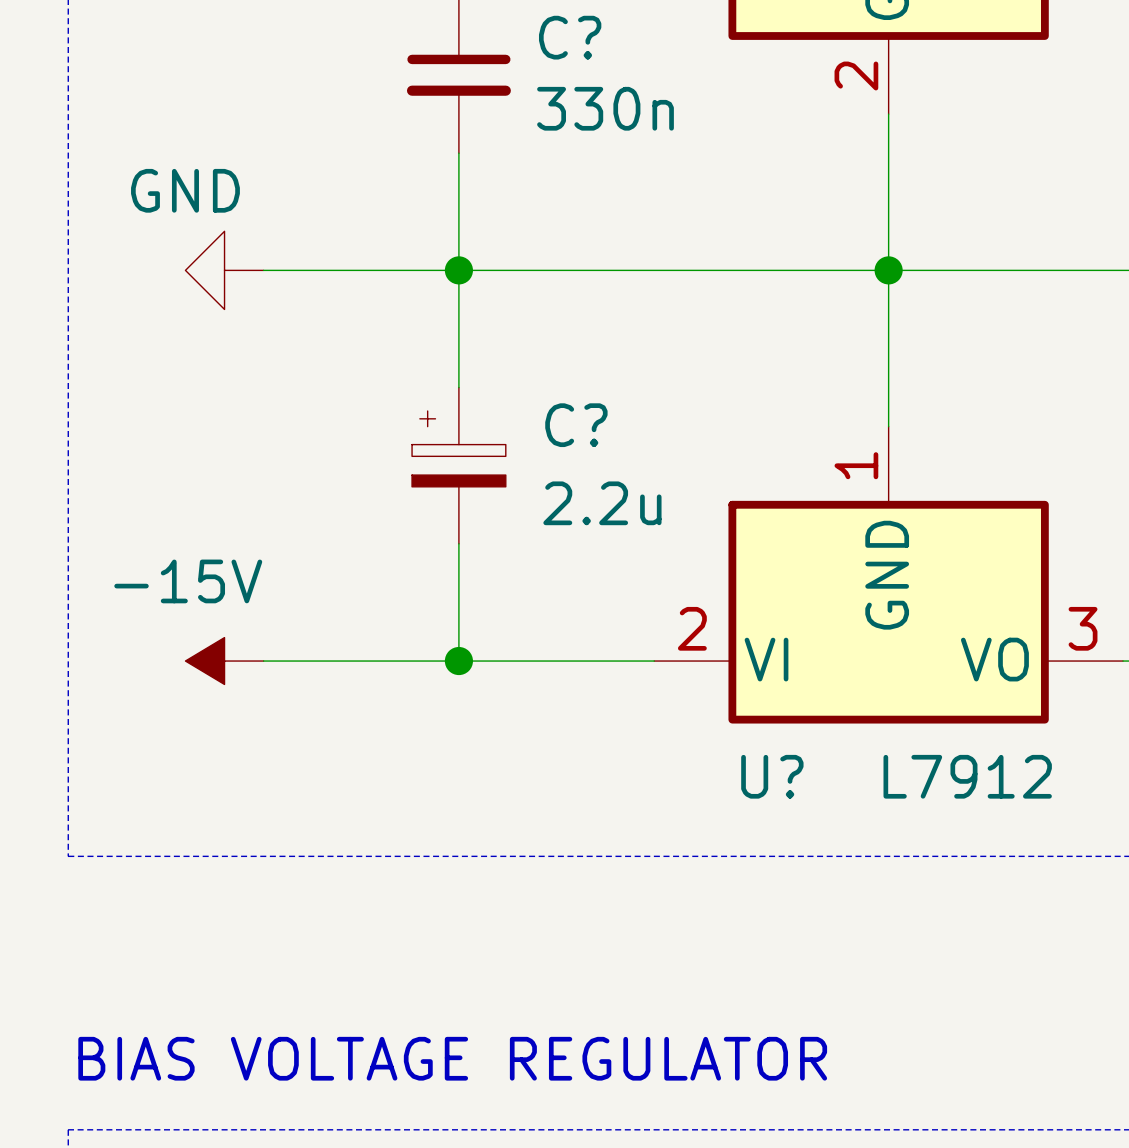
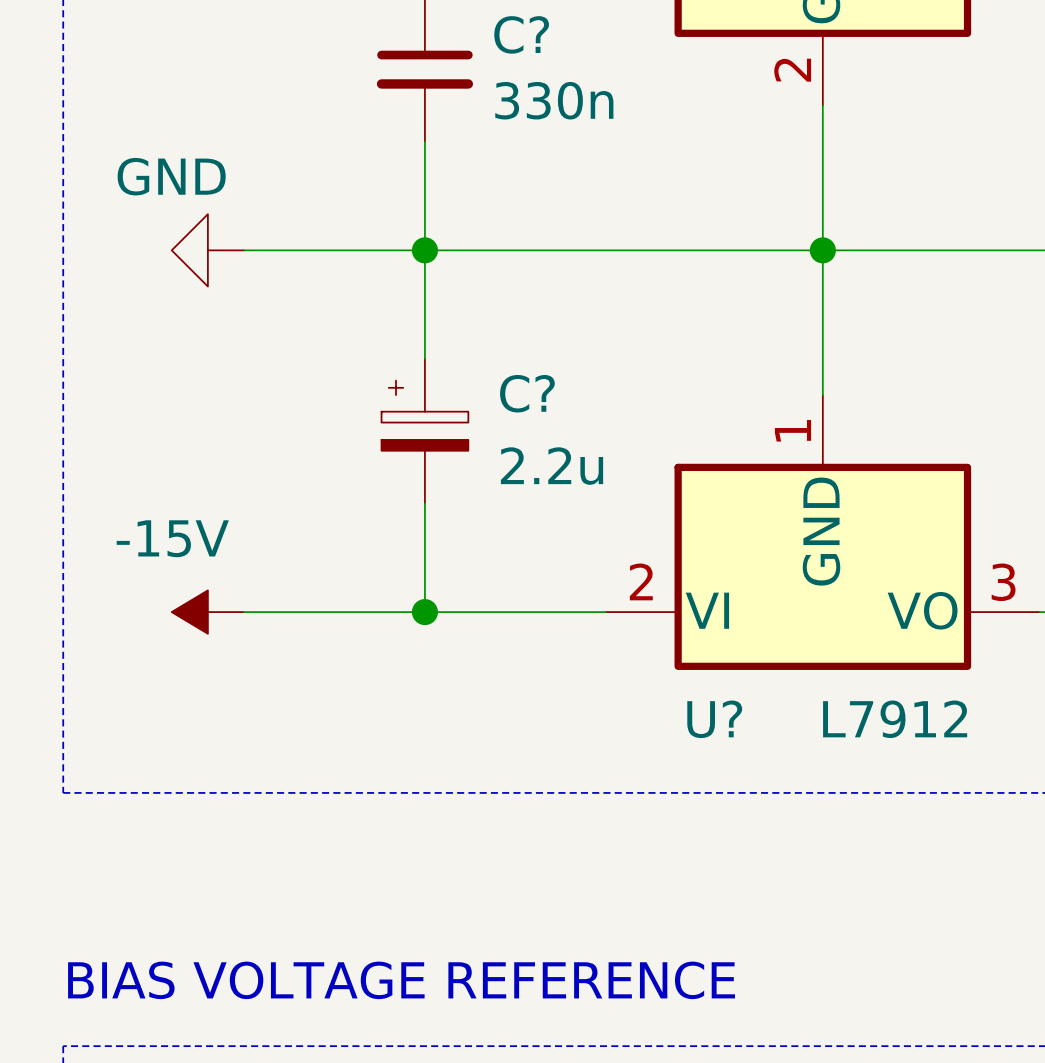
text: BIAS VOLTAGE REGULATOR (452, 1058) -> BIAS VOLTAGE REFERENCE (401, 980)

